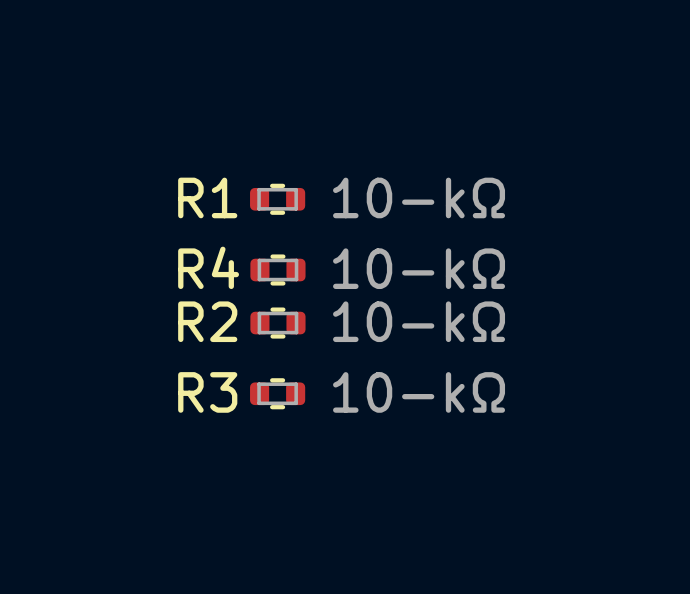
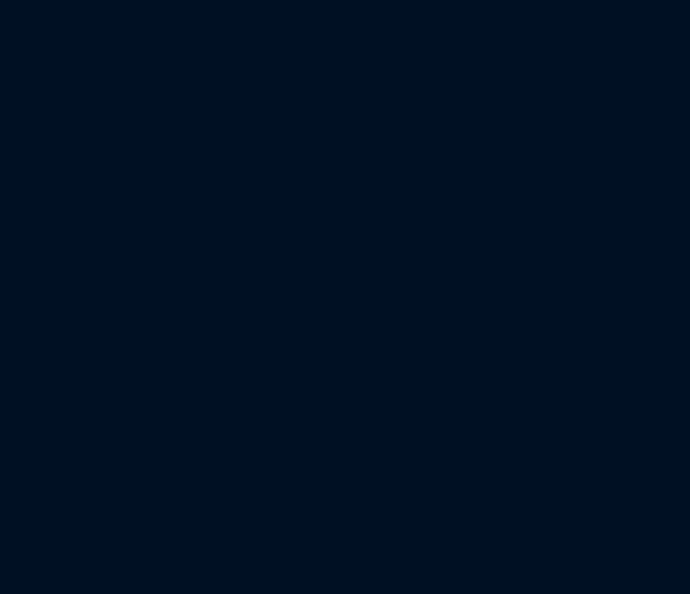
R1: 10-kΩ (277, 199) -> none
R4: 10-kΩ (277, 270) -> none
R2: 10-kΩ (277, 323) -> none
R3: 10-kΩ (277, 393) -> none

